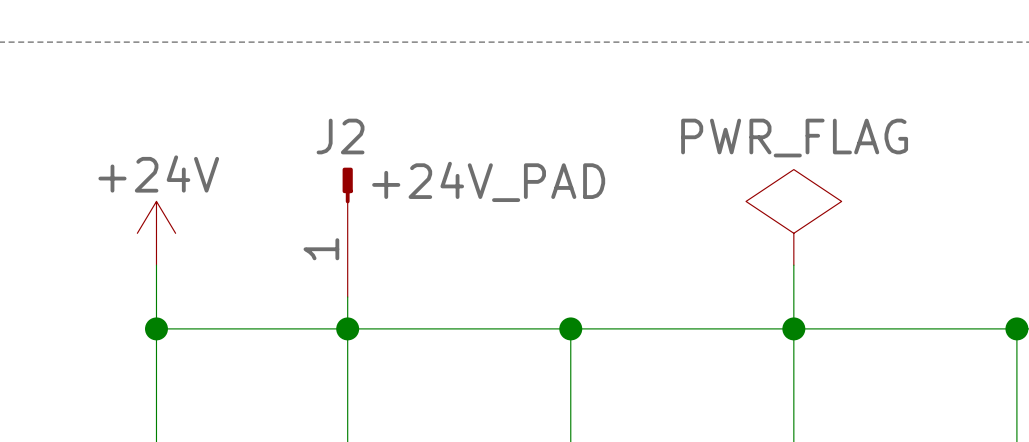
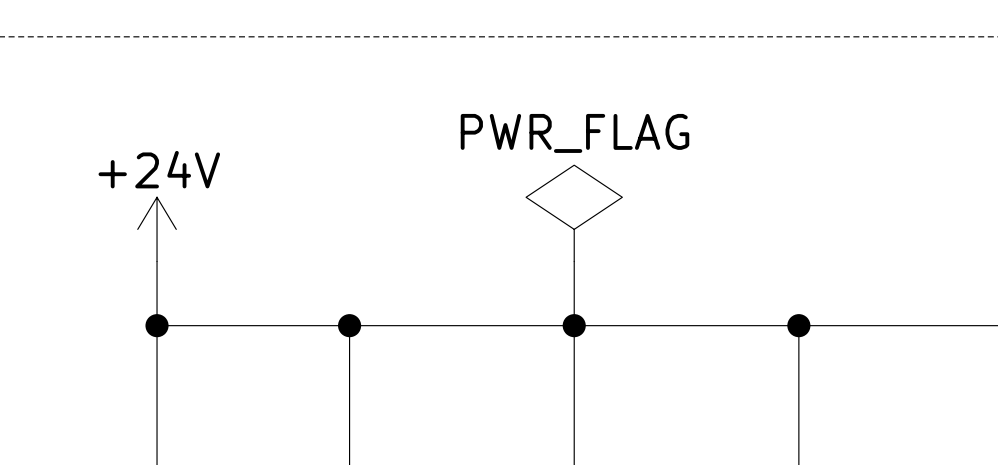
power symbol position: PWR_FLAG (793, 217) -> PWR_FLAG (574, 213)
J2: +24V_PAD (347, 232) -> none
wire: (793, 265) (793, 328) -> (574, 261) (574, 325)
wire: (347, 297) (347, 328) -> none

